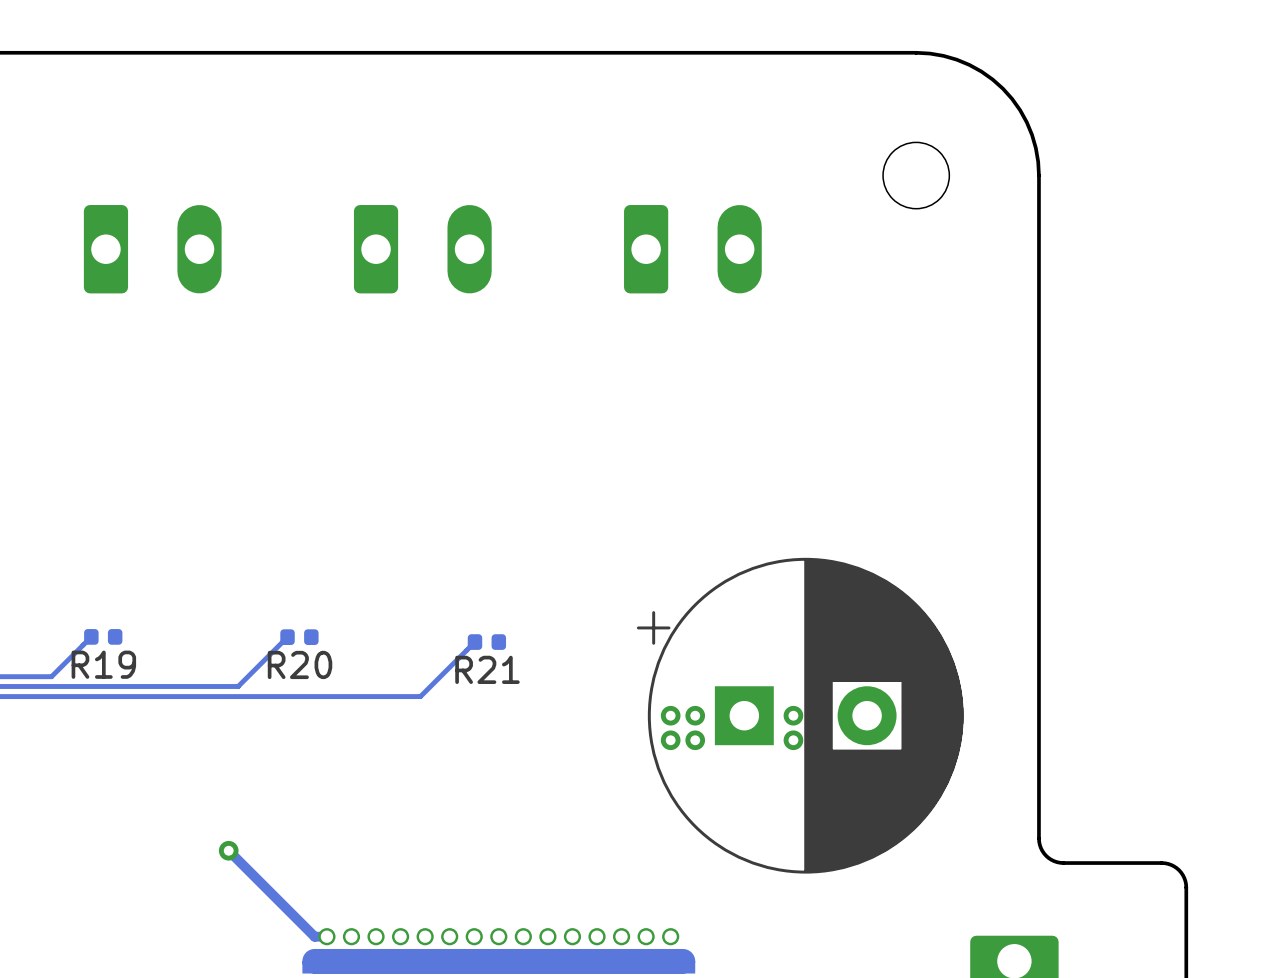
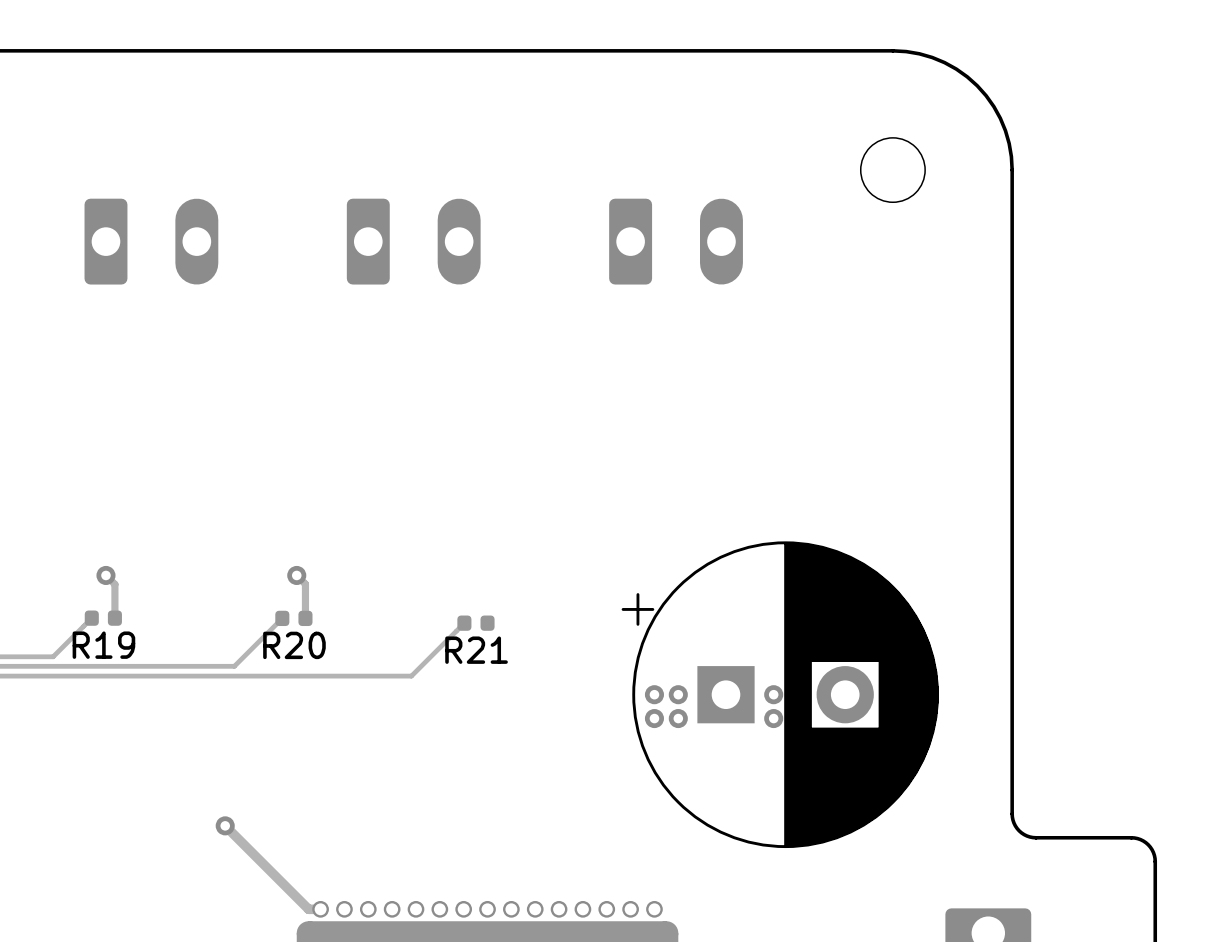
track: none -> (105, 575) (114, 584) (114, 618)
via: none -> (105, 575)
track: none -> (296, 575) (305, 584) (305, 618)
via: none -> (296, 575)

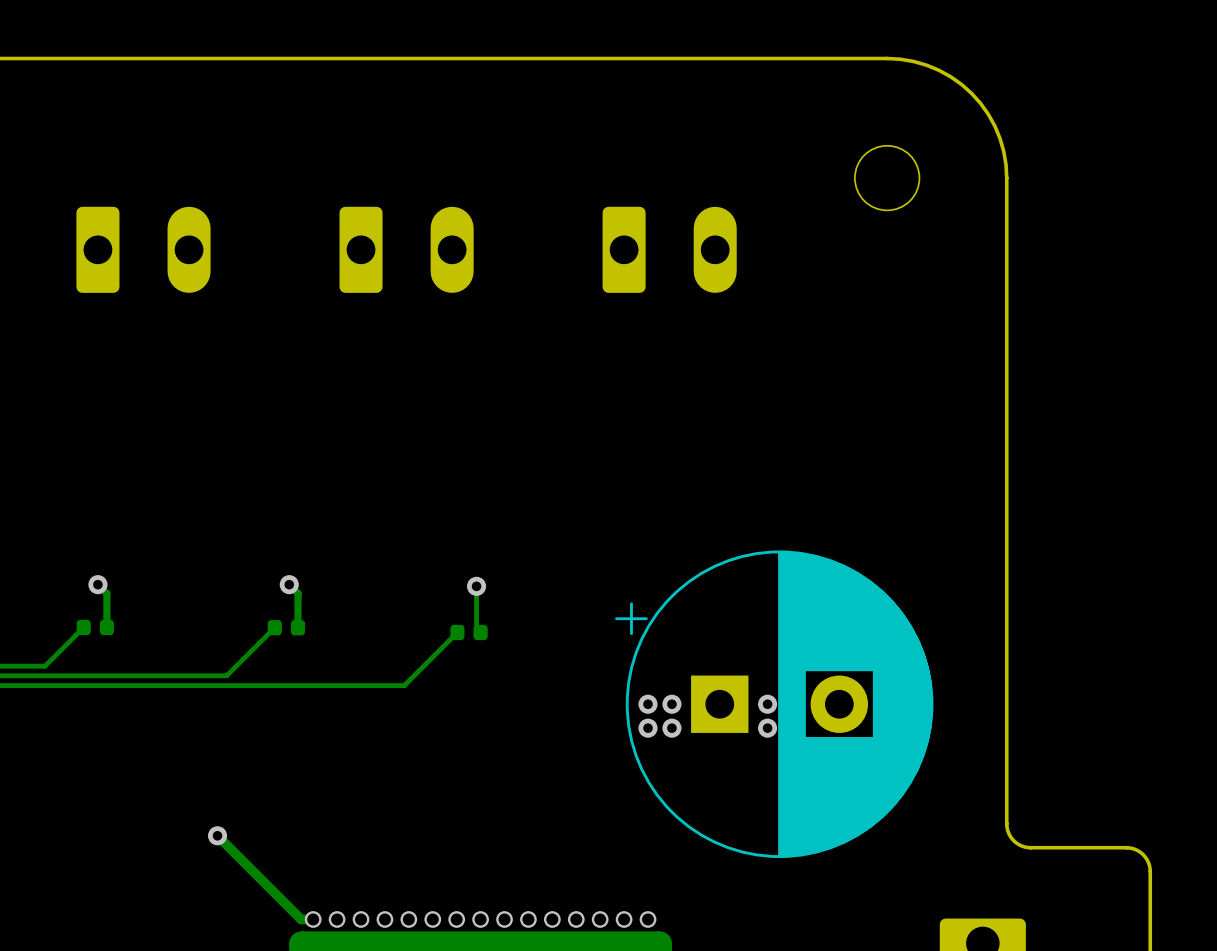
track: none -> (476, 586) (476, 628) (480, 632)
via: none -> (476, 586)
R19 name: R19 (103, 645) -> none
R20 name: R20 (294, 645) -> none
R21 name: R21 (476, 650) -> none

